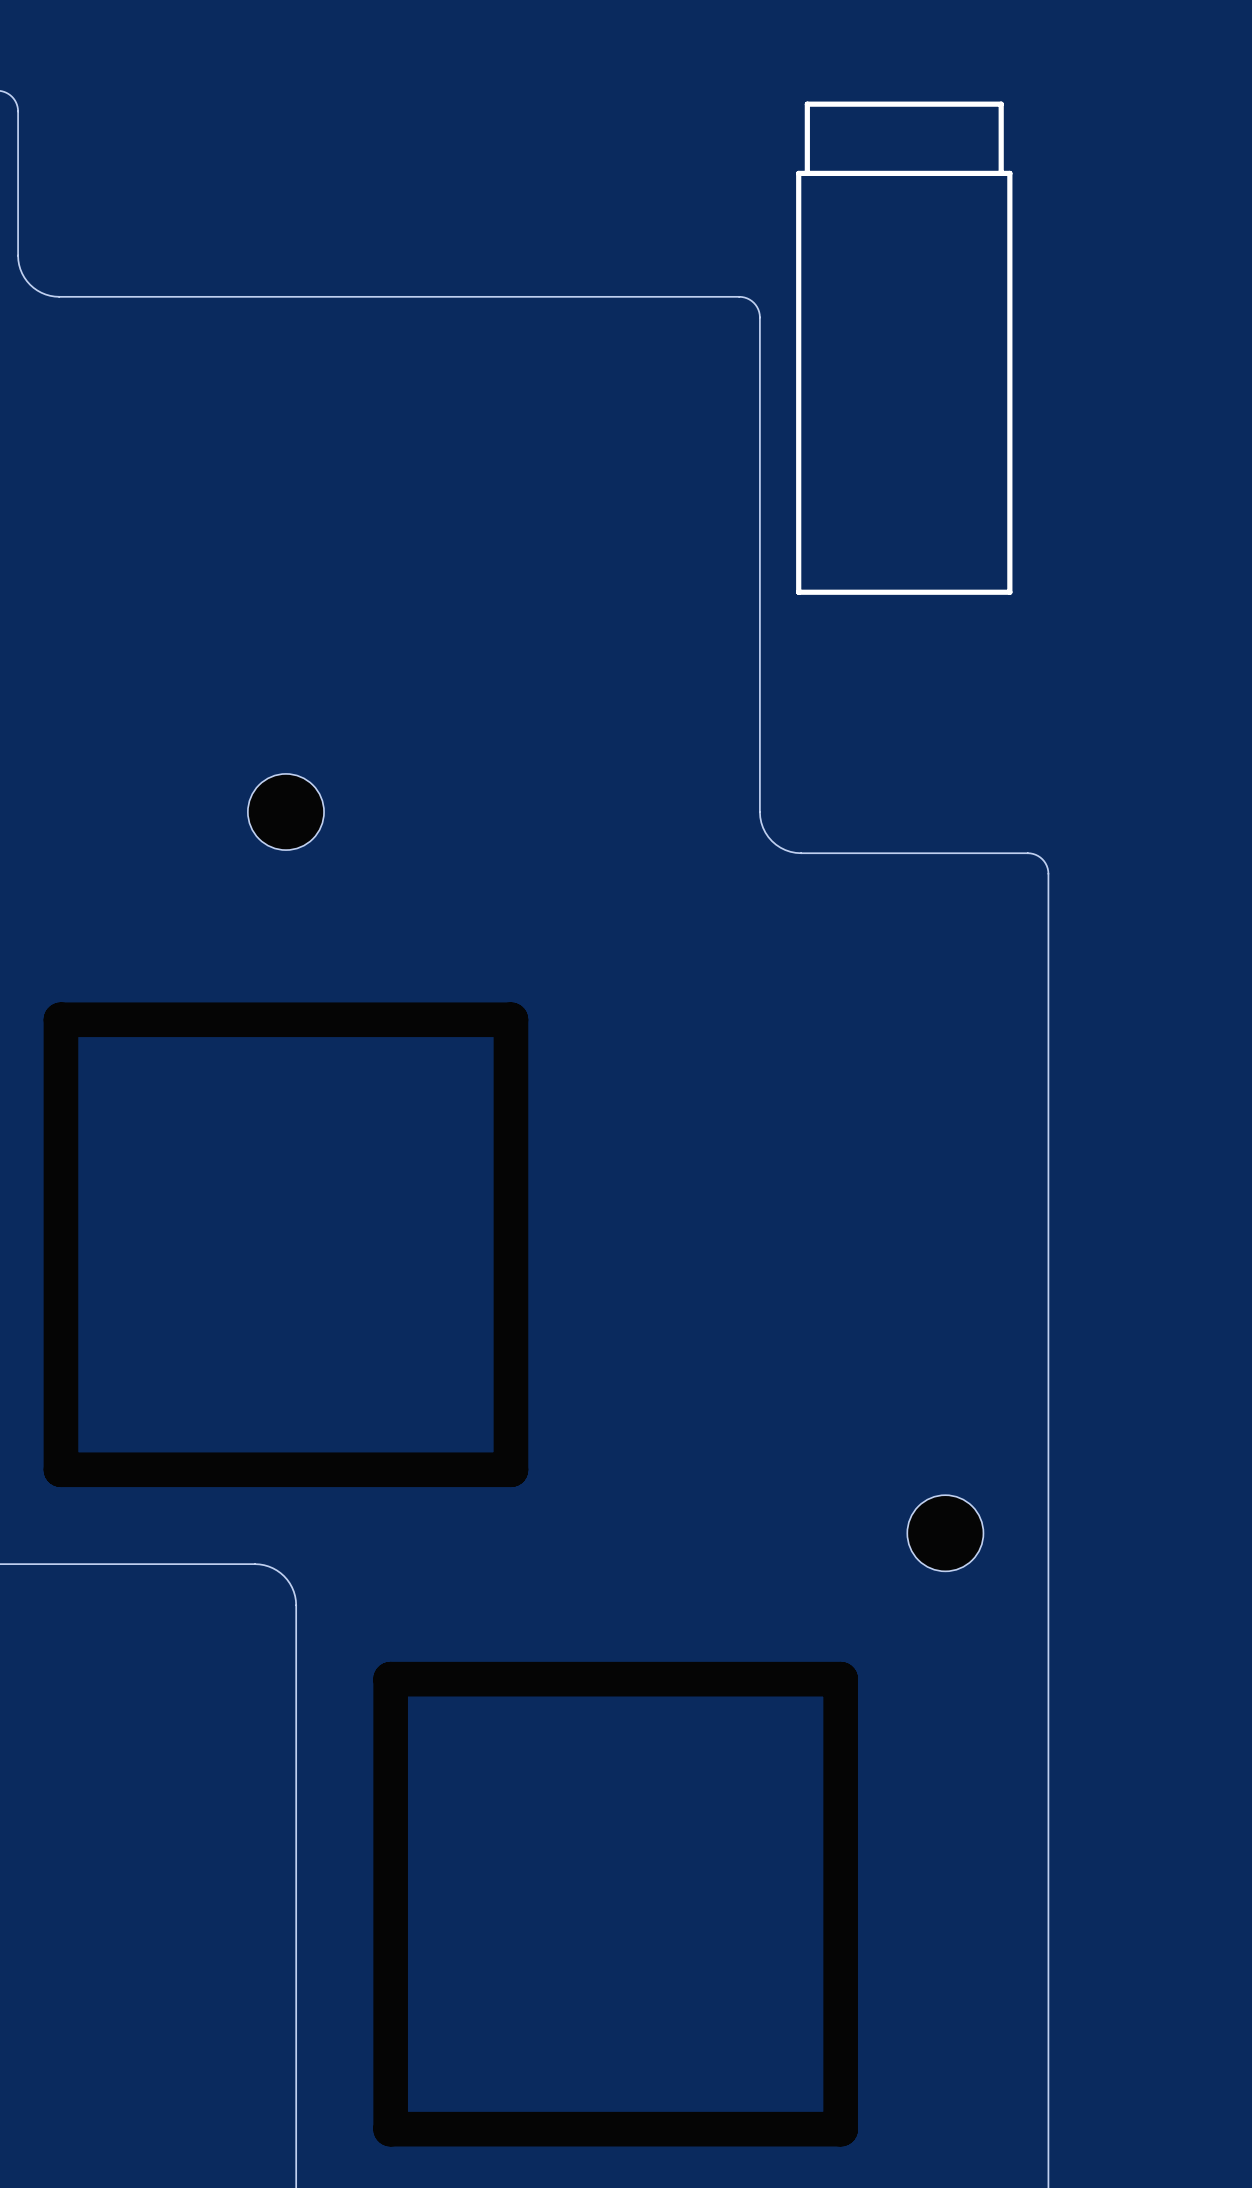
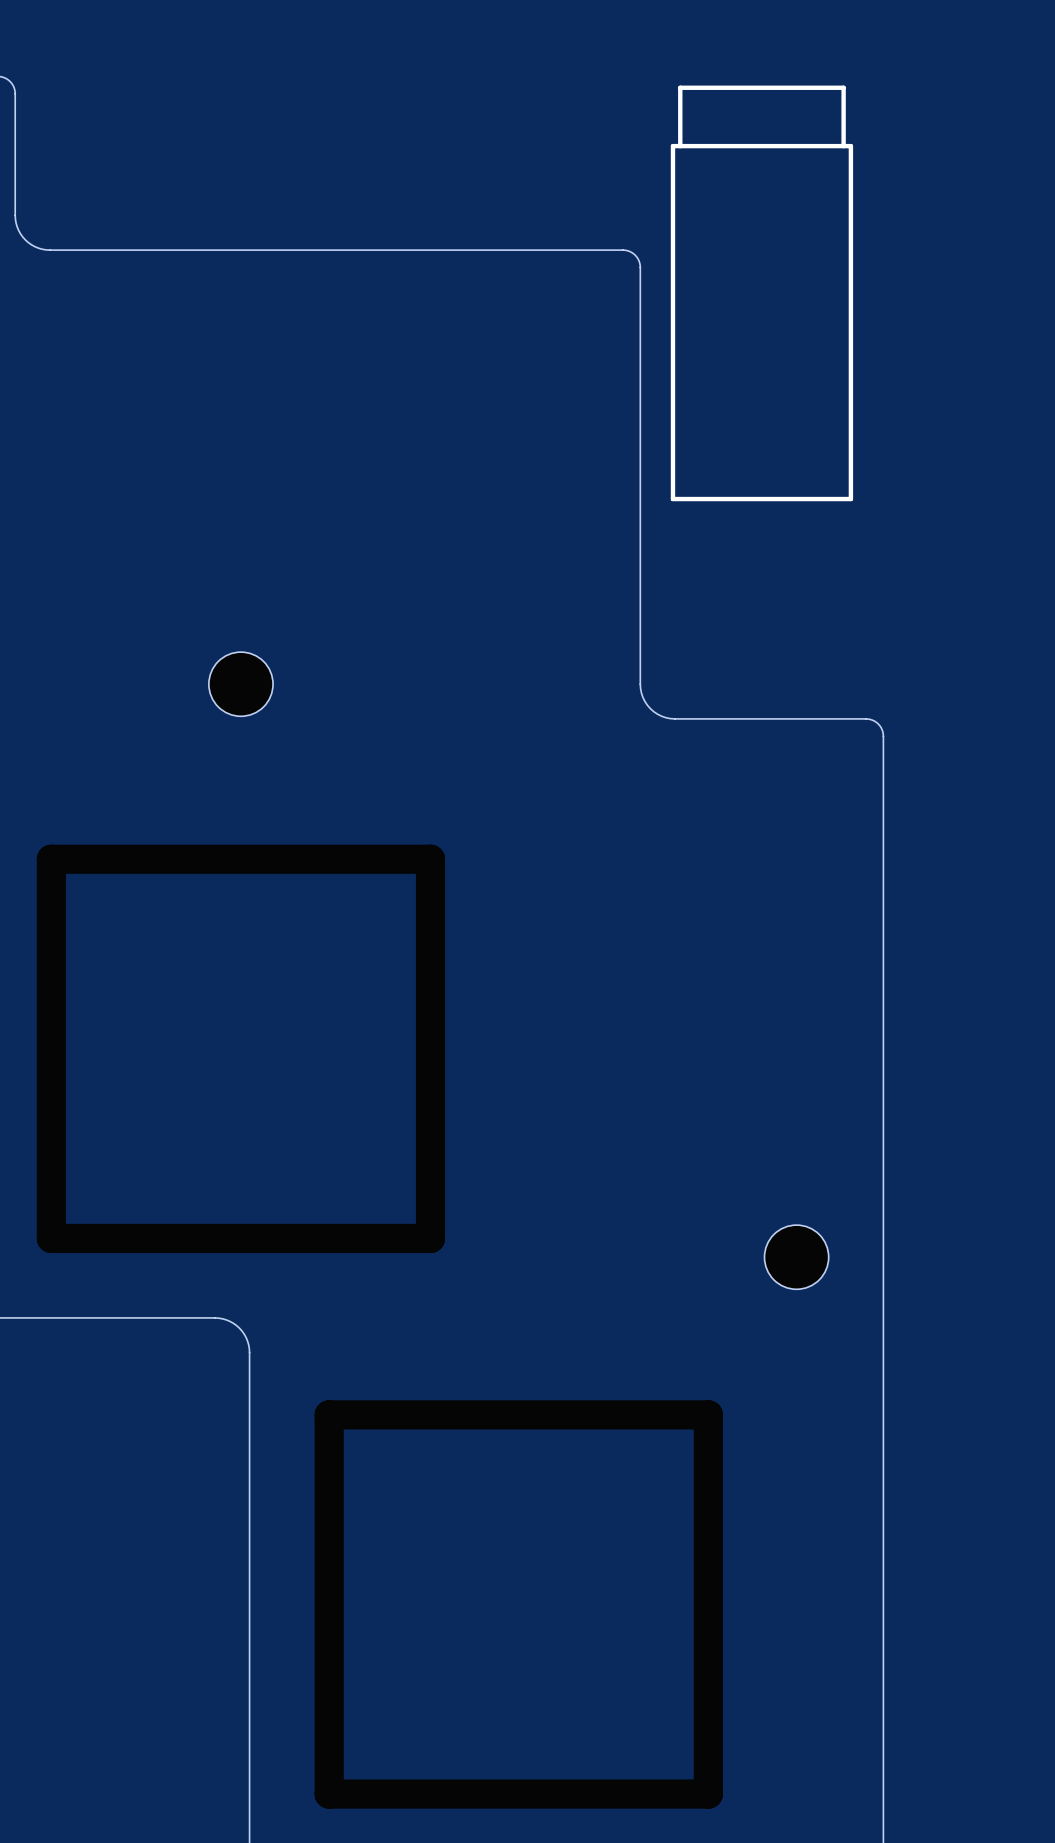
part position: (945, 1533) -> (796, 1257)

